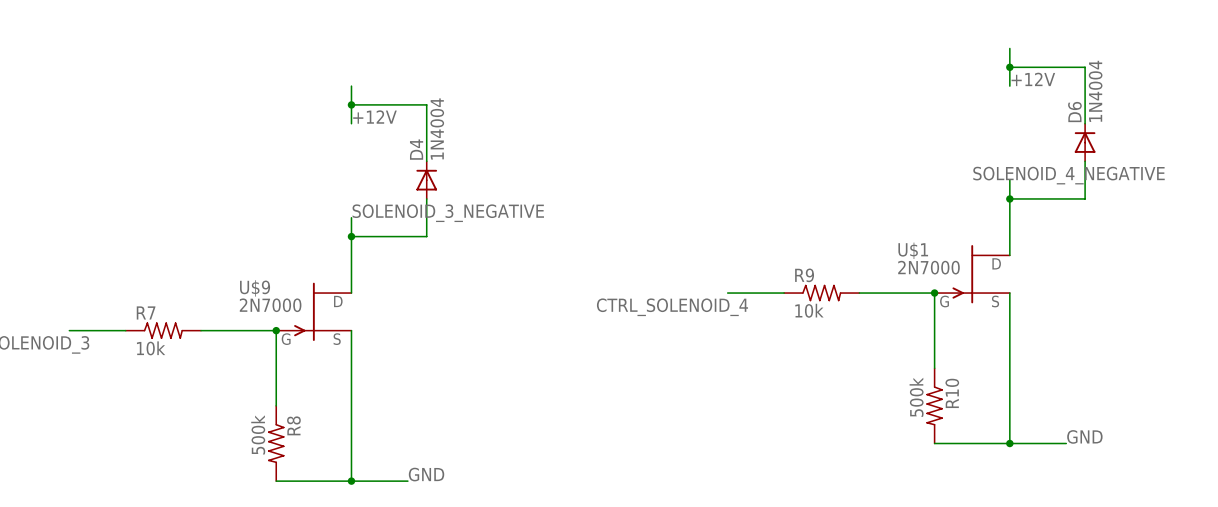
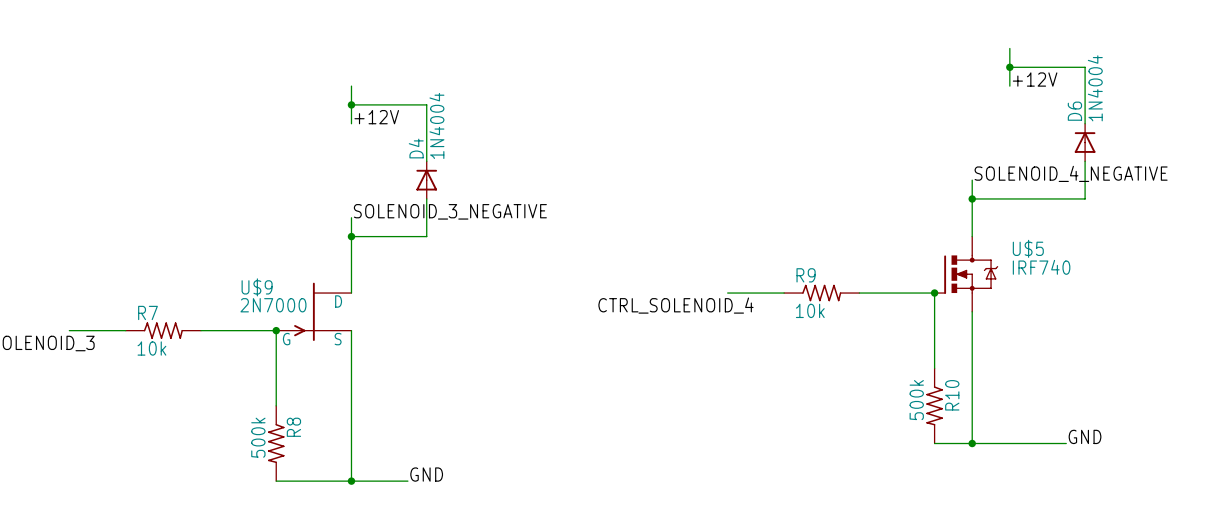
wire: none -> (972, 180) (972, 236)
wire: (1009, 180) (1009, 255) -> none
wire: none -> (972, 198) (1009, 198)
junction position: (1009, 198) -> (972, 198)
U$5: none -> IRF740 (966, 274)
U$1: 2N7000 (972, 274) -> none
wire: (1009, 293) (1009, 443) -> none
wire: none -> (972, 311) (972, 443)
junction position: (1009, 443) -> (972, 443)

